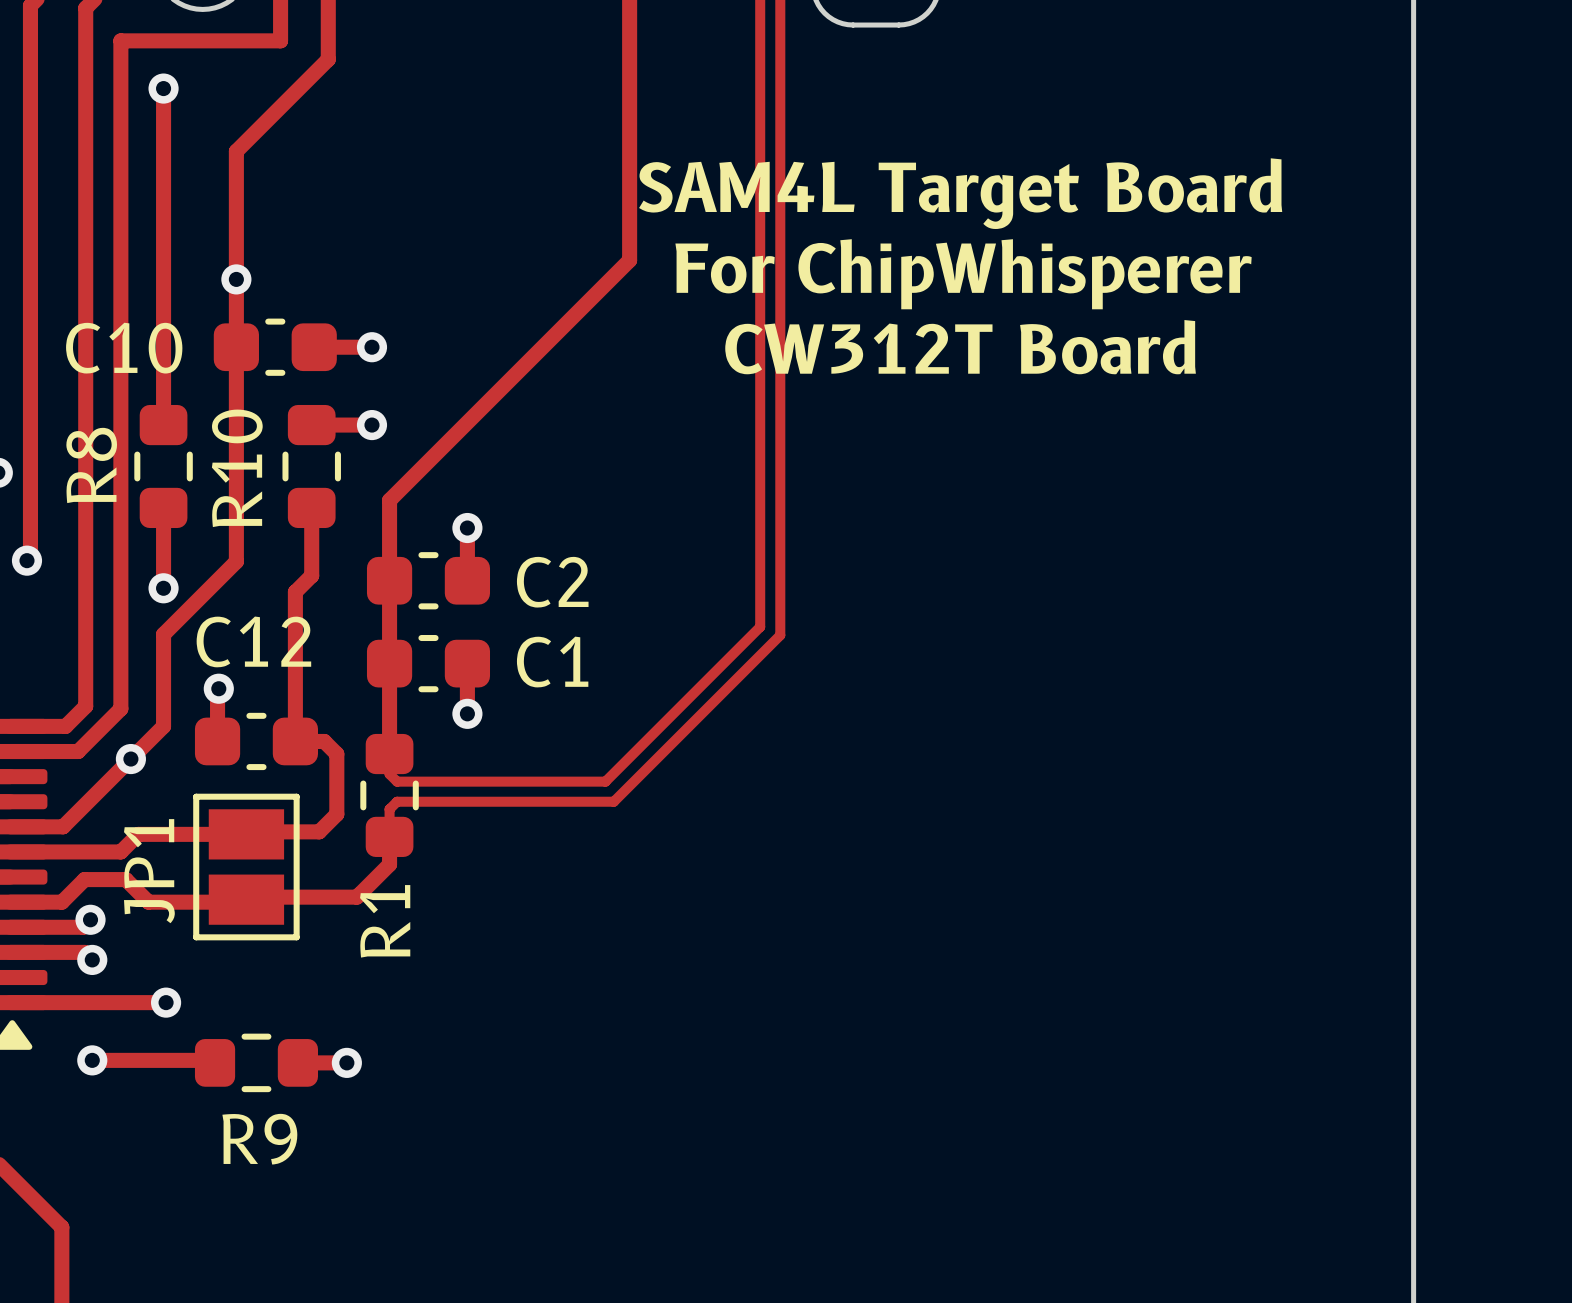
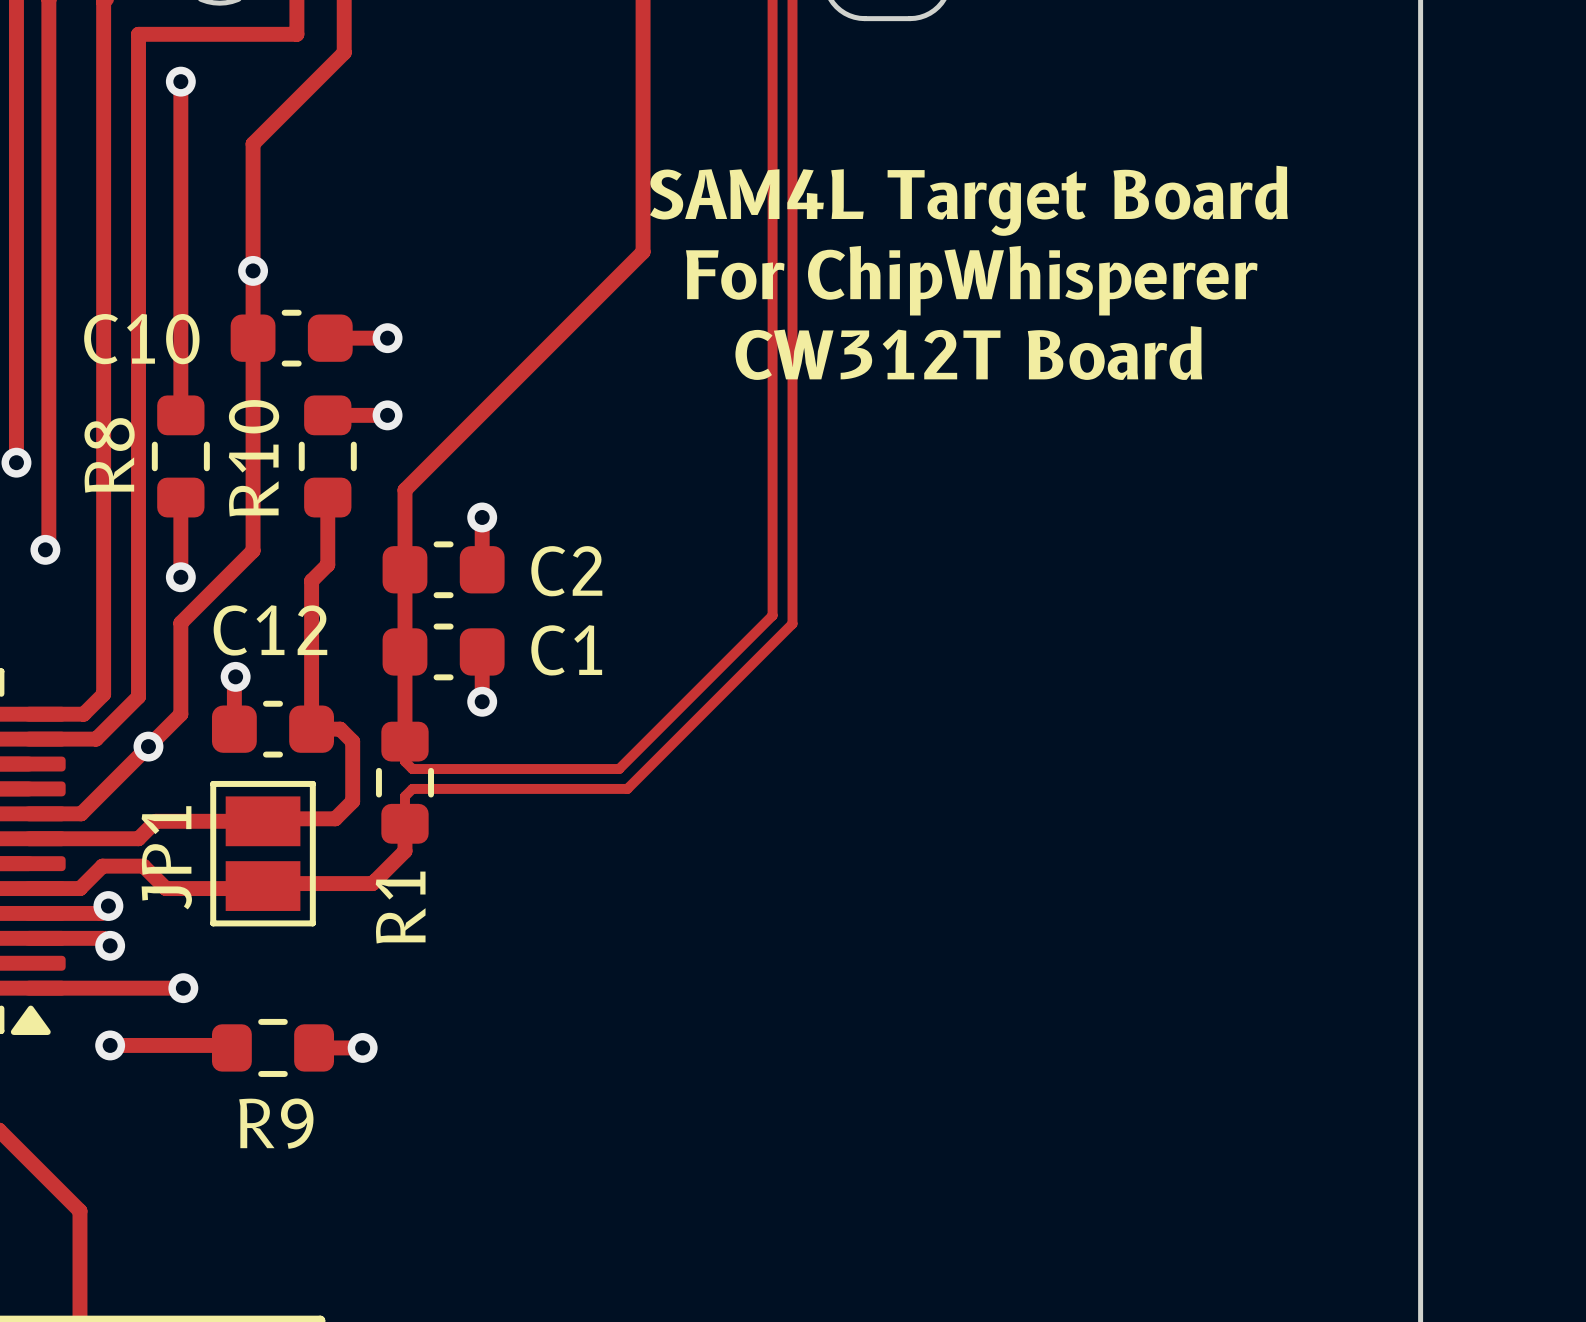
text position: SAM4L Target Board (960, 193) -> SAM4L Target Board (968, 200)
text position: For ChipWhisperer (963, 274) -> For ChipWhisperer (971, 280)
text position: CW312T Board (960, 347) -> CW312T Board (968, 353)

